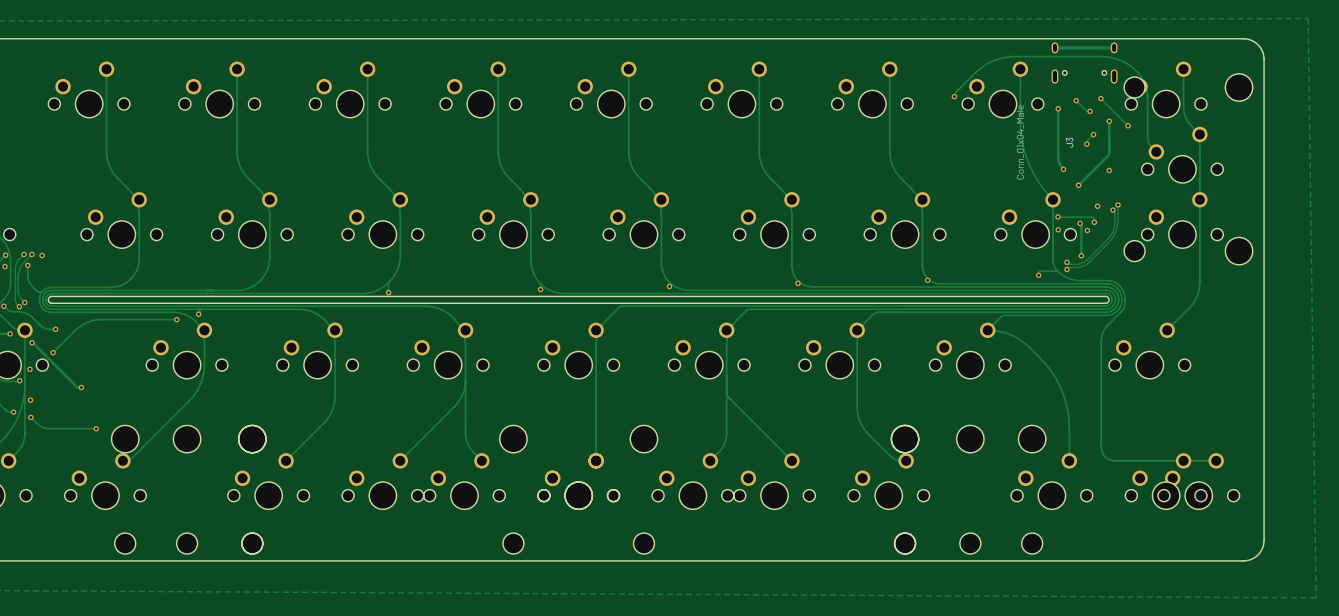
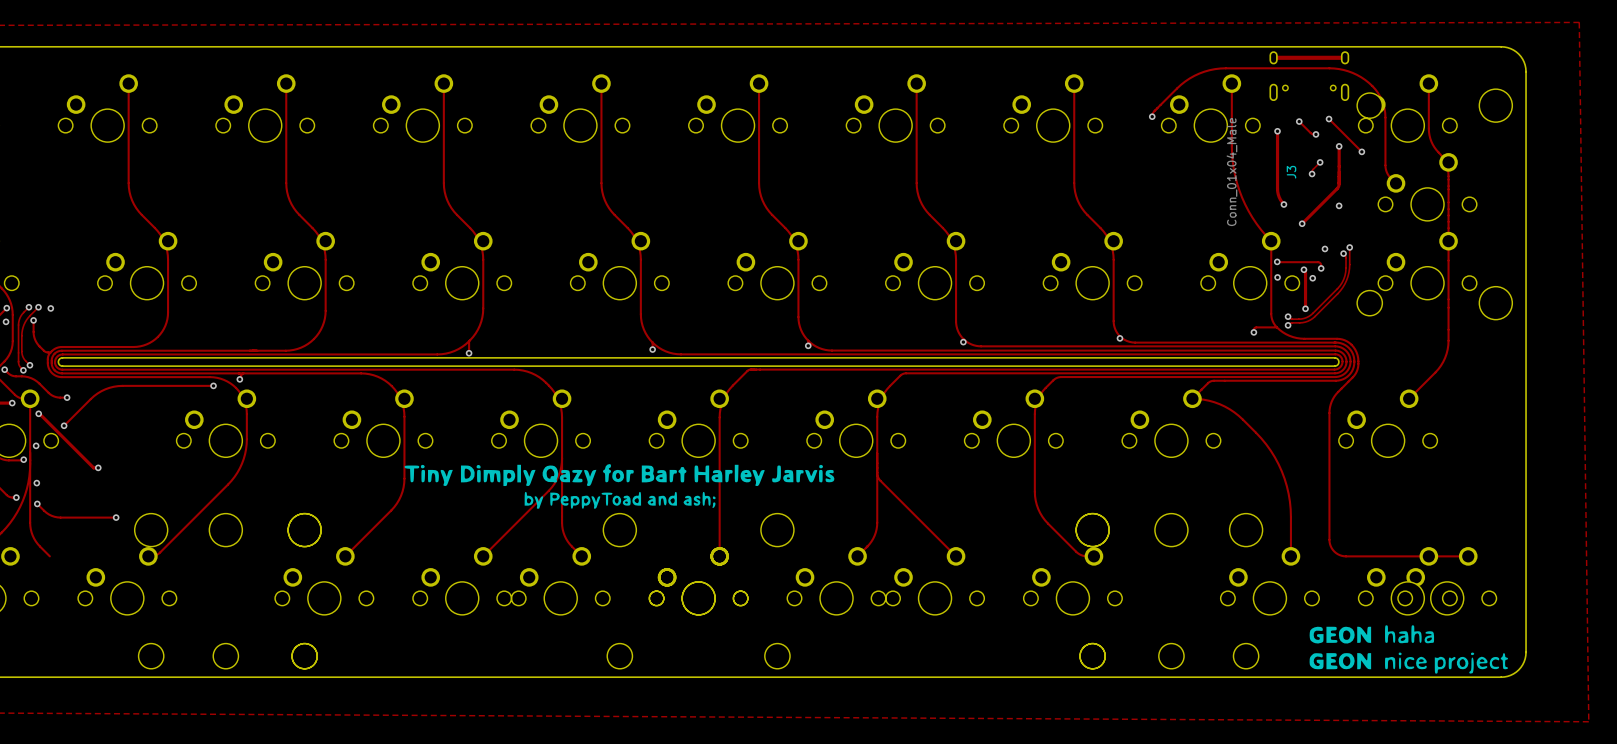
drawing: none -> [404, 464, 835, 509]
track: (24, 433) (21, 446) (8, 460) -> (30, 522) (34, 538) (49, 556)
drawing: none -> [1309, 625, 1509, 674]

